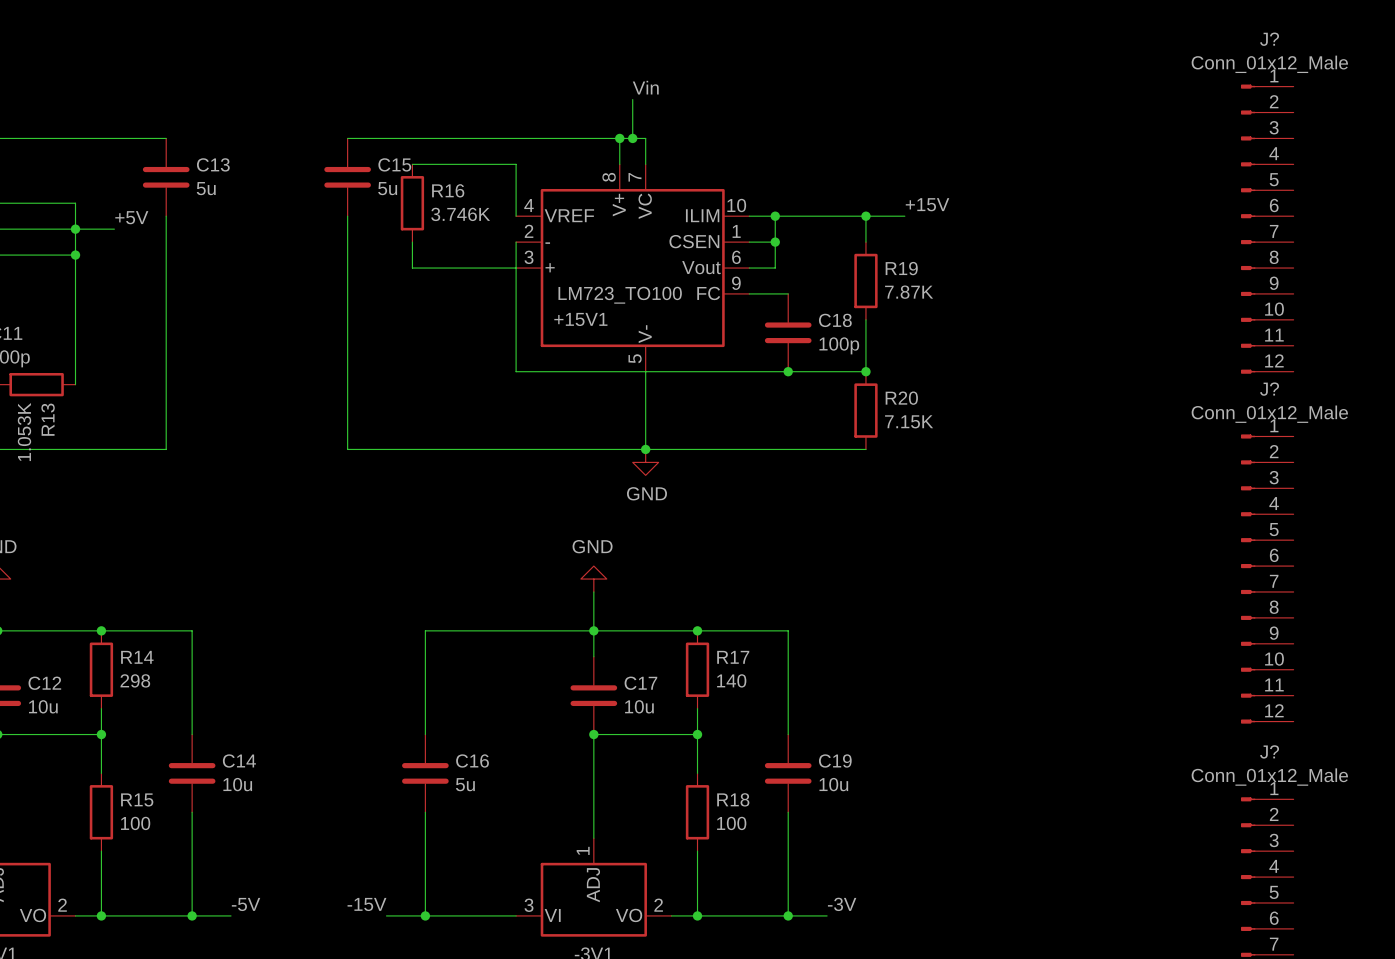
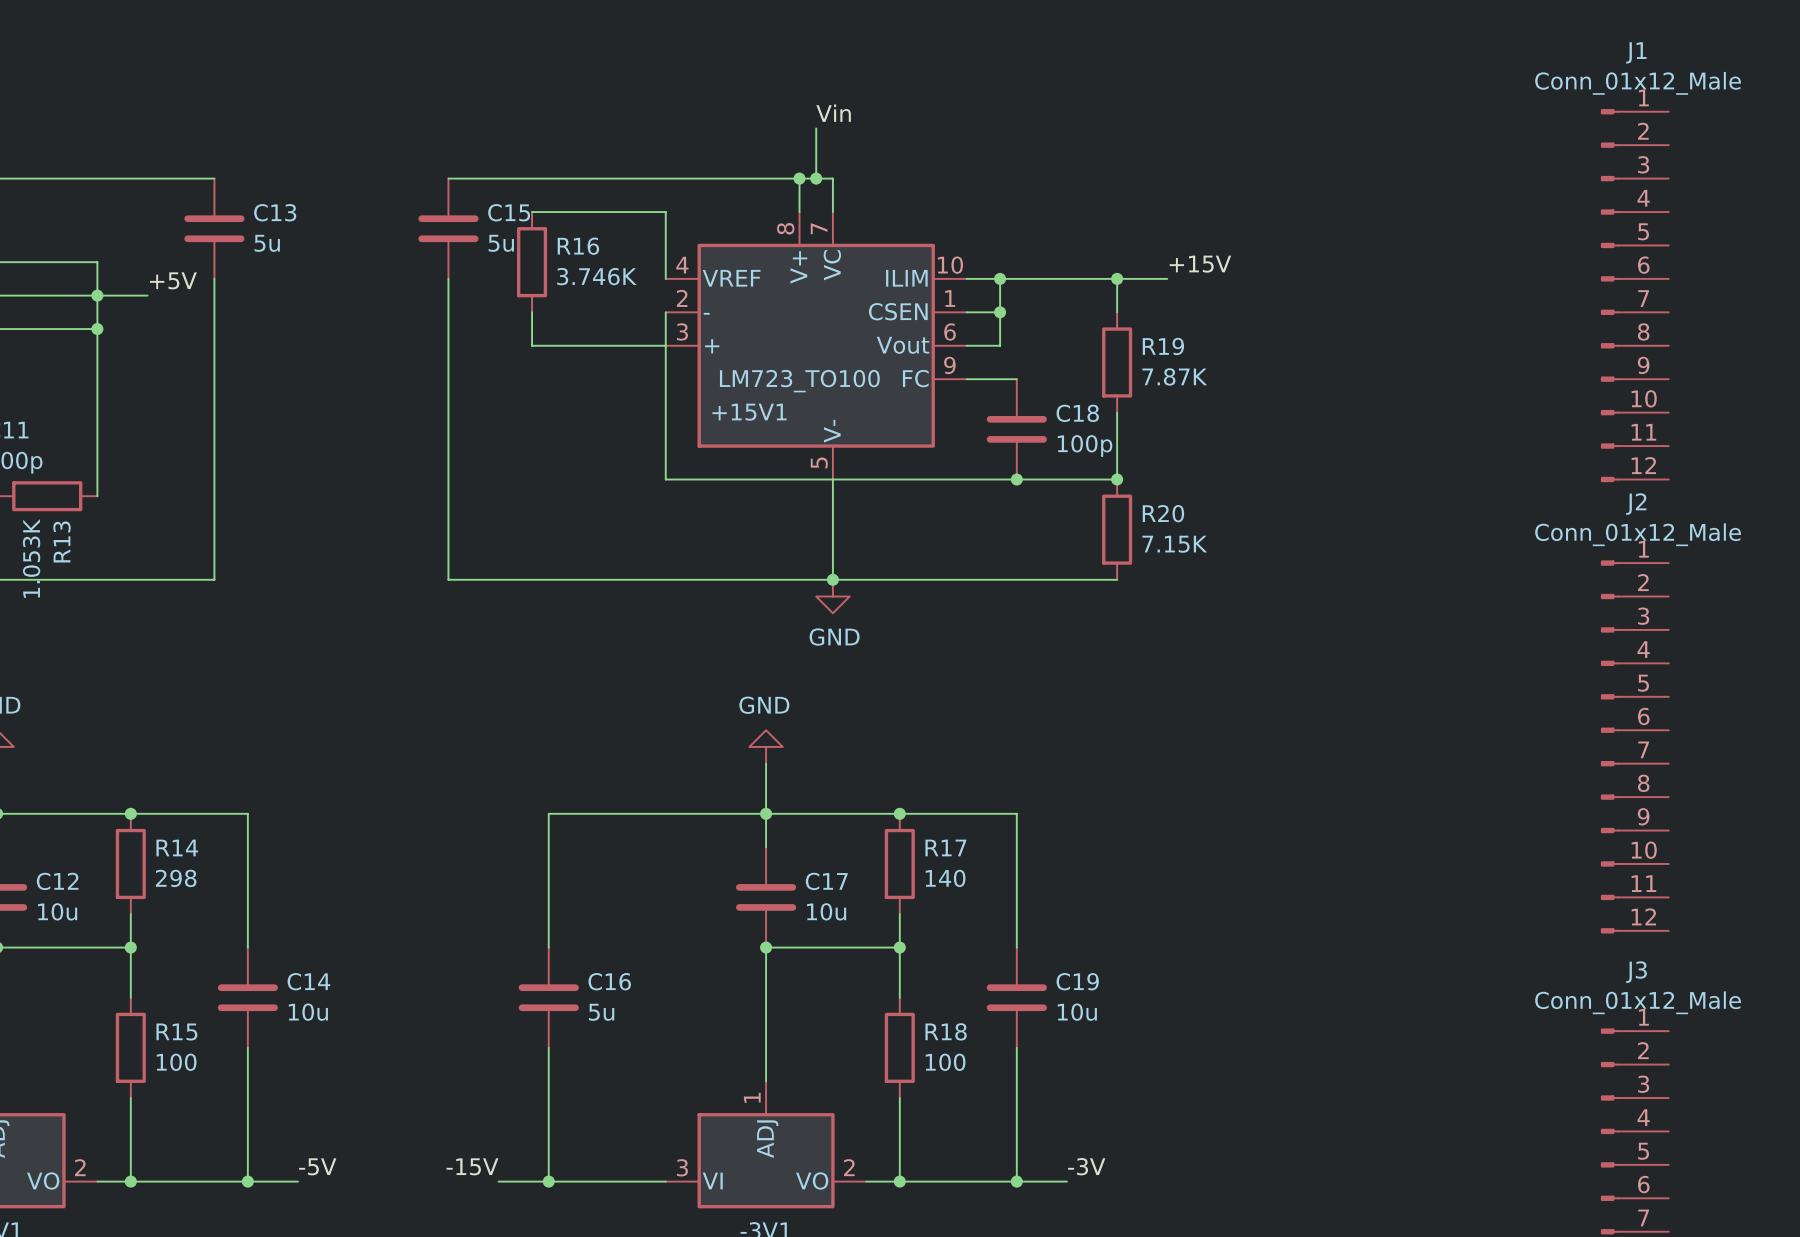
J? name: J? (1269, 39) -> J1 (1636, 52)
J? name: J? (1269, 389) -> J2 (1636, 504)
J? name: J? (1269, 751) -> J3 (1636, 972)

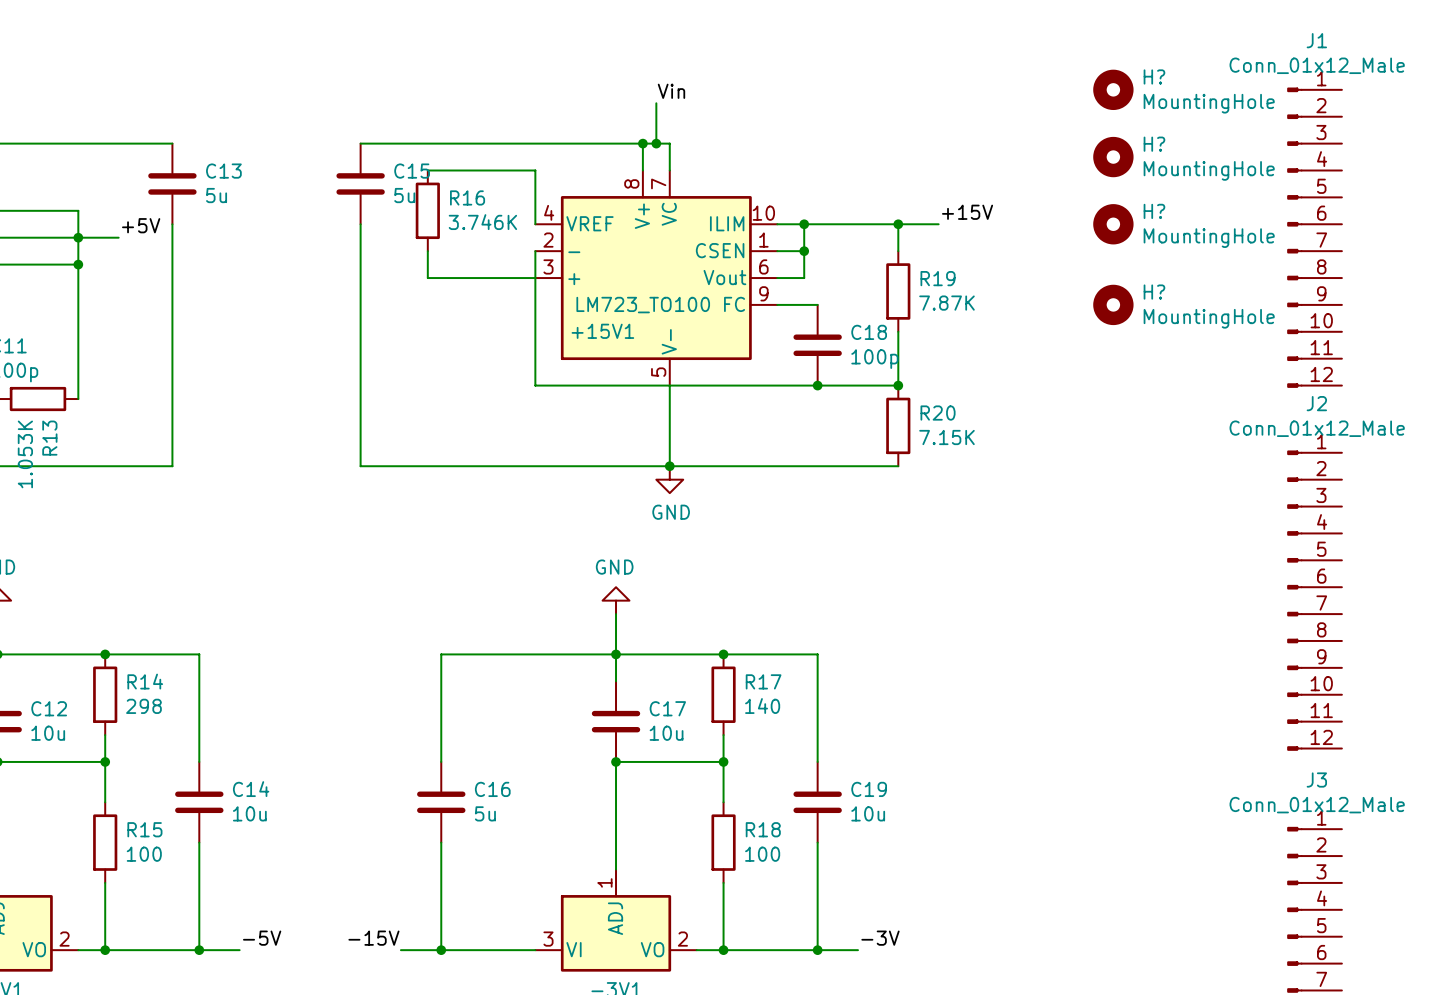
H?: none -> MountingHole (1113, 89)
H?: none -> MountingHole (1113, 157)
H?: none -> MountingHole (1113, 224)
H?: none -> MountingHole (1113, 304)

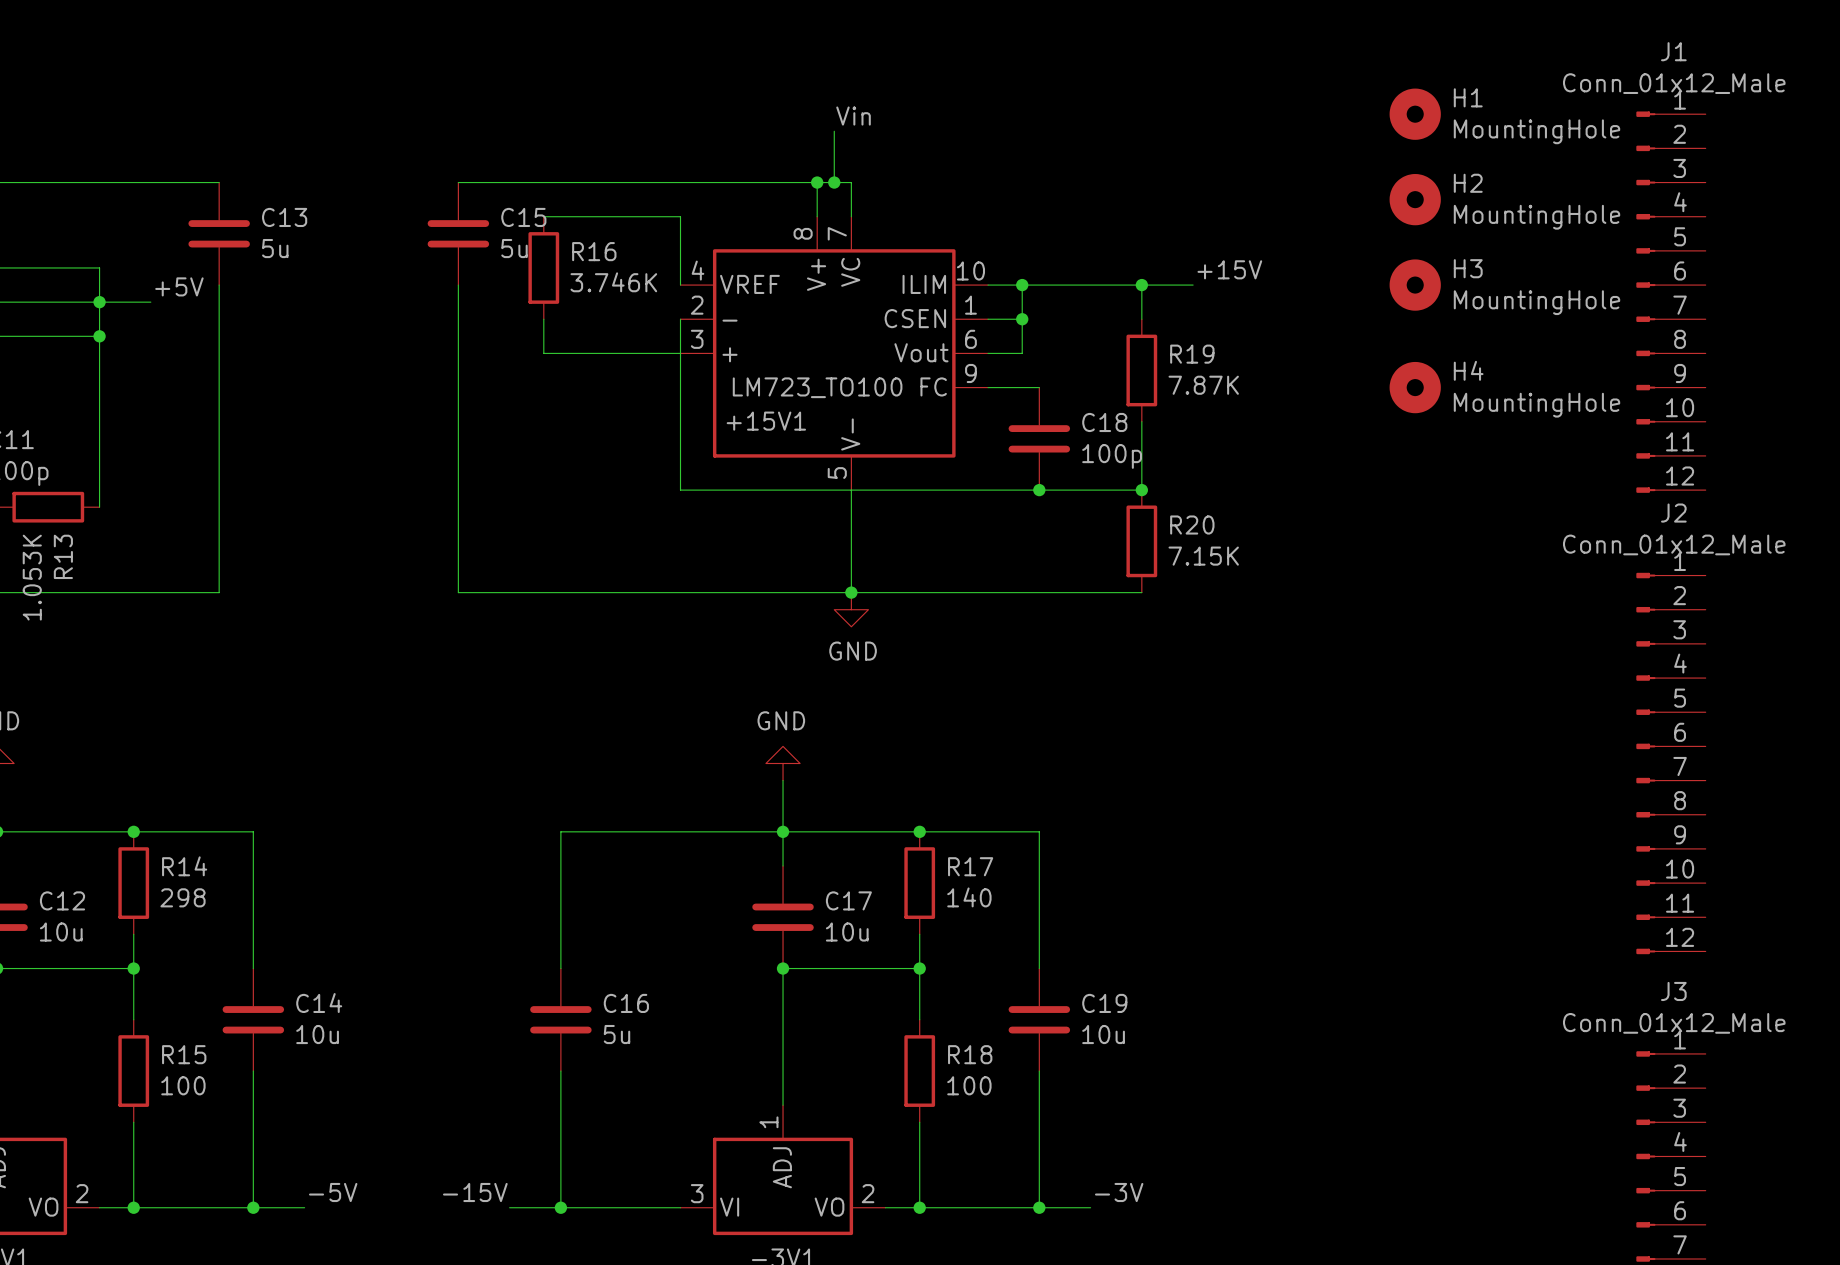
H? name: H? (1154, 76) -> H1 (1468, 97)
H? name: H? (1154, 144) -> H2 (1468, 183)
H? name: H? (1154, 211) -> H3 (1468, 268)
H? name: H? (1154, 292) -> H4 (1468, 370)

